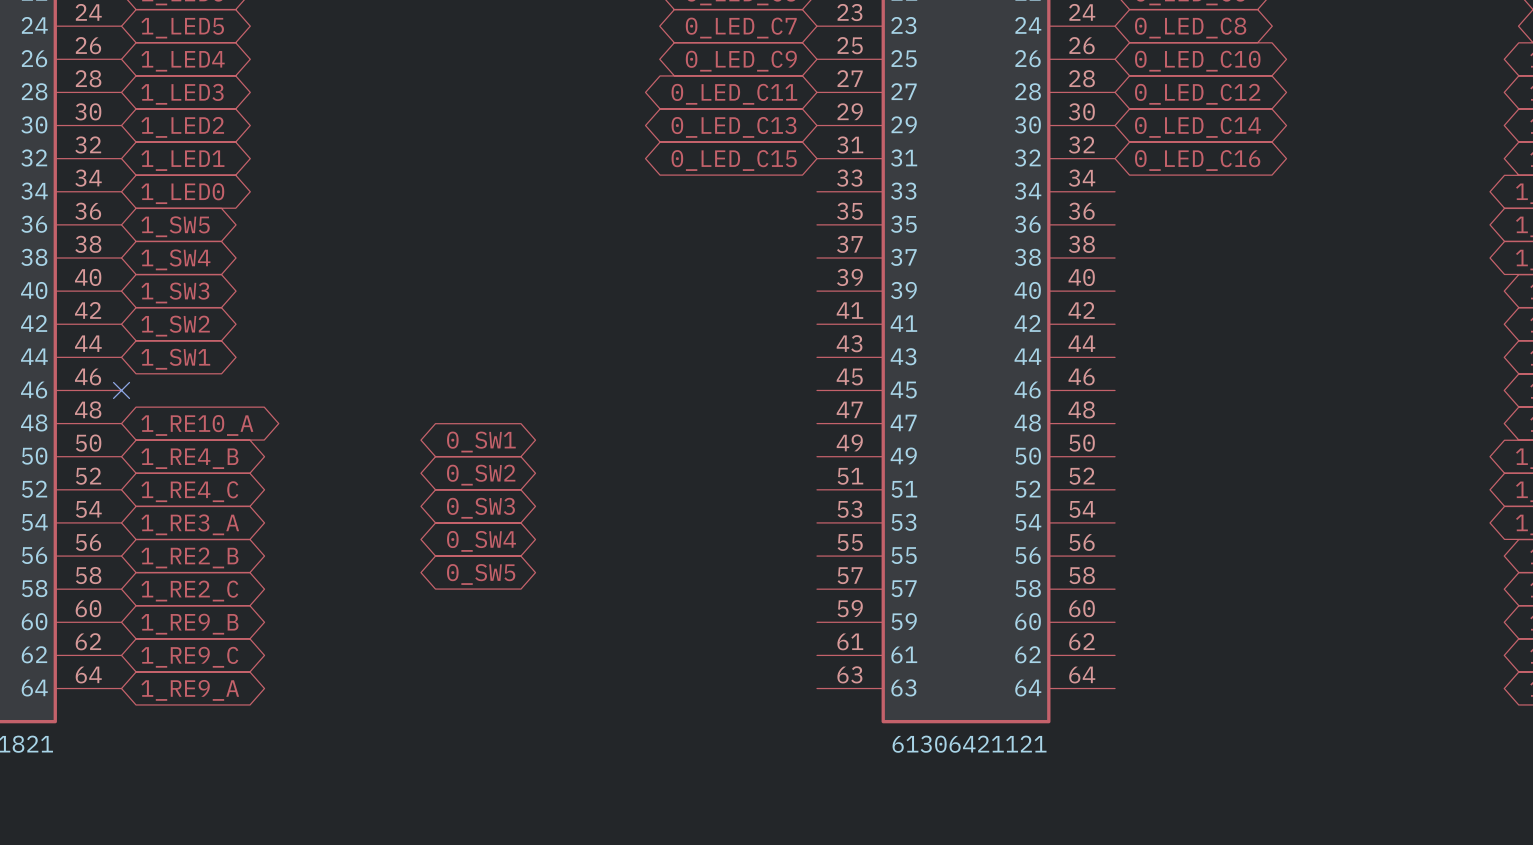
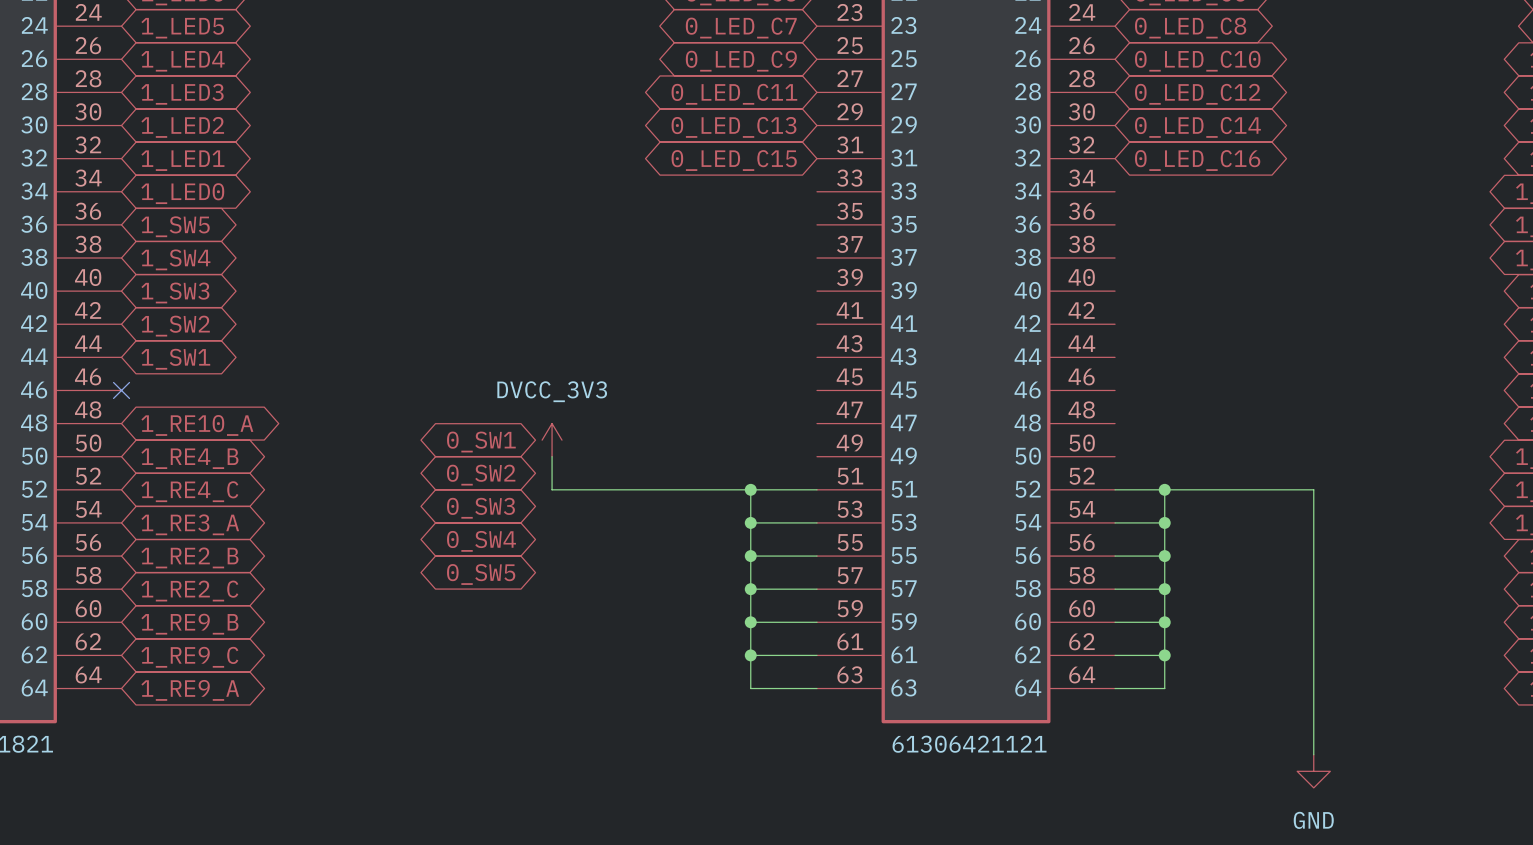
power symbol: none -> DVCC_3V3 (552, 440)
wire: none -> (552, 456) (552, 489) (816, 489)
wire: none -> (750, 489) (750, 688) (816, 688)
junction: none -> (750, 489)
wire: none -> (1115, 489) (1313, 489) (1313, 754)
wire: none -> (1164, 489) (1164, 688) (1115, 688)
junction: none -> (1164, 489)
wire: none -> (750, 522) (816, 522)
junction: none -> (750, 522)
wire: none -> (1115, 522) (1164, 522)
junction: none -> (1164, 522)
wire: none -> (750, 556) (816, 556)
junction: none -> (750, 556)
wire: none -> (1115, 556) (1164, 556)
junction: none -> (1164, 556)
wire: none -> (750, 589) (816, 589)
junction: none -> (750, 589)
wire: none -> (1115, 589) (1164, 589)
junction: none -> (1164, 589)
wire: none -> (750, 622) (816, 622)
junction: none -> (750, 622)
wire: none -> (1115, 622) (1164, 622)
junction: none -> (1164, 622)
wire: none -> (750, 655) (816, 655)
junction: none -> (750, 655)
wire: none -> (1115, 655) (1164, 655)
junction: none -> (1164, 655)
power symbol: none -> GND (1313, 771)

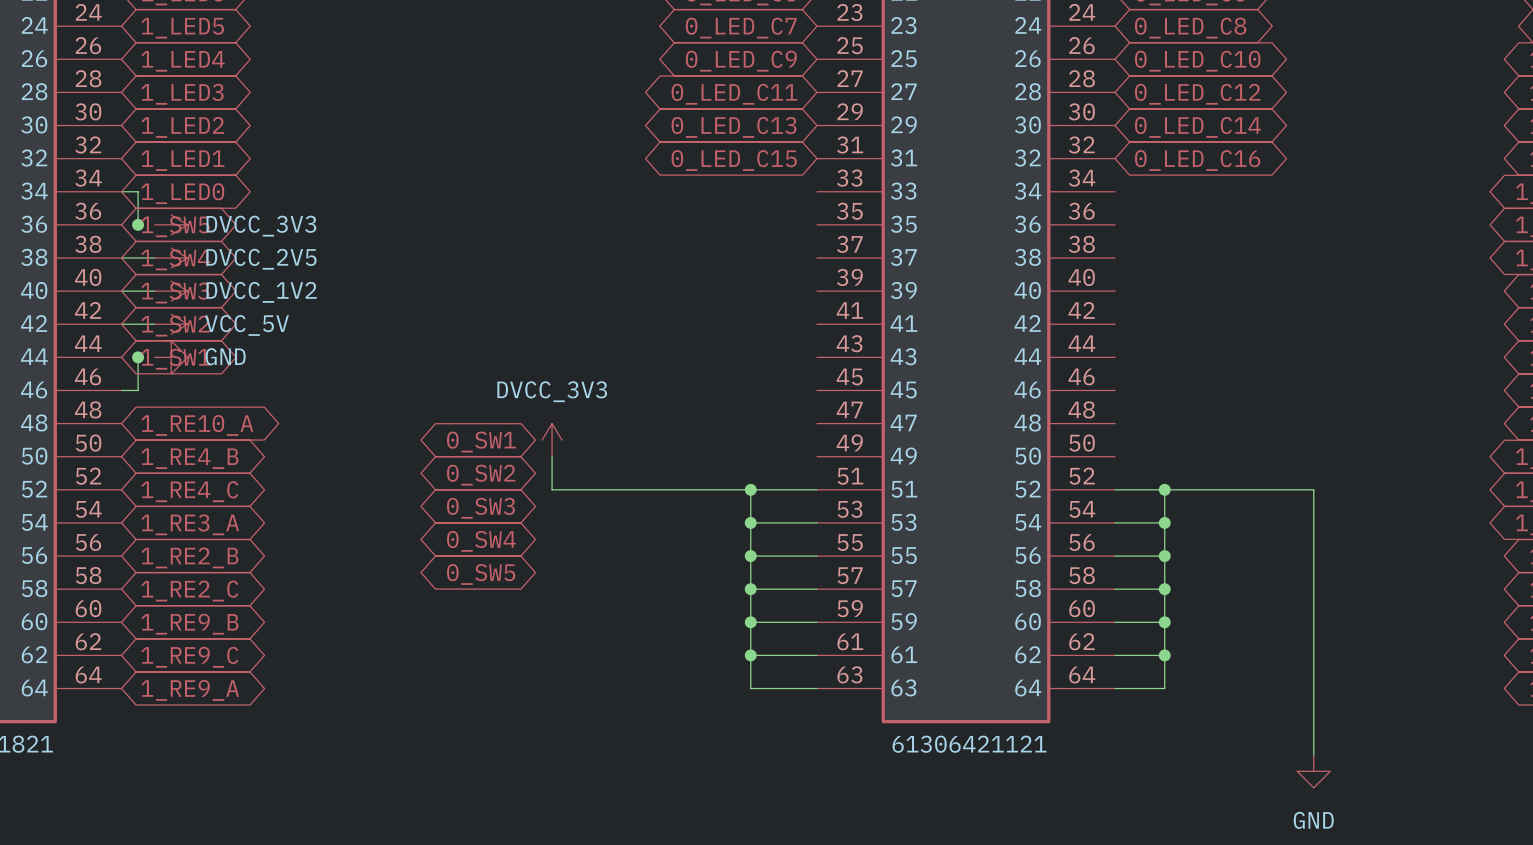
wire: none -> (121, 191) (138, 191) (138, 224)
junction: none -> (138, 224)
power symbol: none -> DVCC_3V3 (171, 224)
wire: none -> (121, 258) (154, 258)
power symbol: none -> DVCC_2V5 (171, 258)
wire: none -> (121, 291) (154, 291)
power symbol: none -> DVCC_1V2 (171, 291)
wire: none -> (121, 324) (154, 324)
power symbol: none -> VCC_5V (171, 324)
wire: none -> (138, 357) (138, 390) (121, 390)
junction: none -> (138, 357)
power symbol: none -> GND (171, 357)
no-connect mark: (121, 390) -> none

